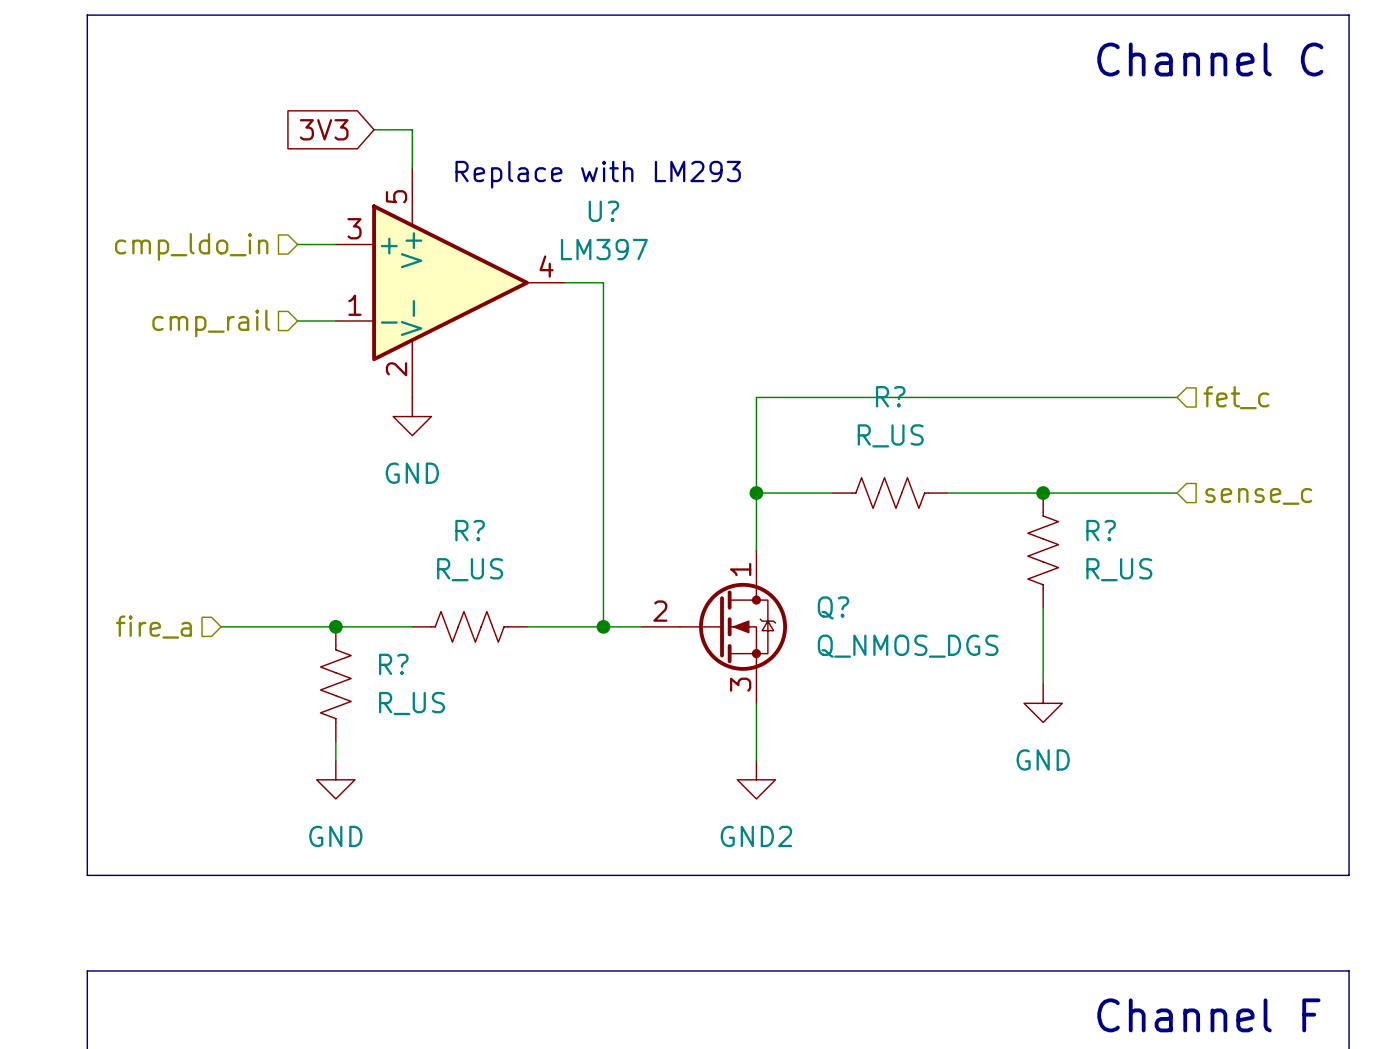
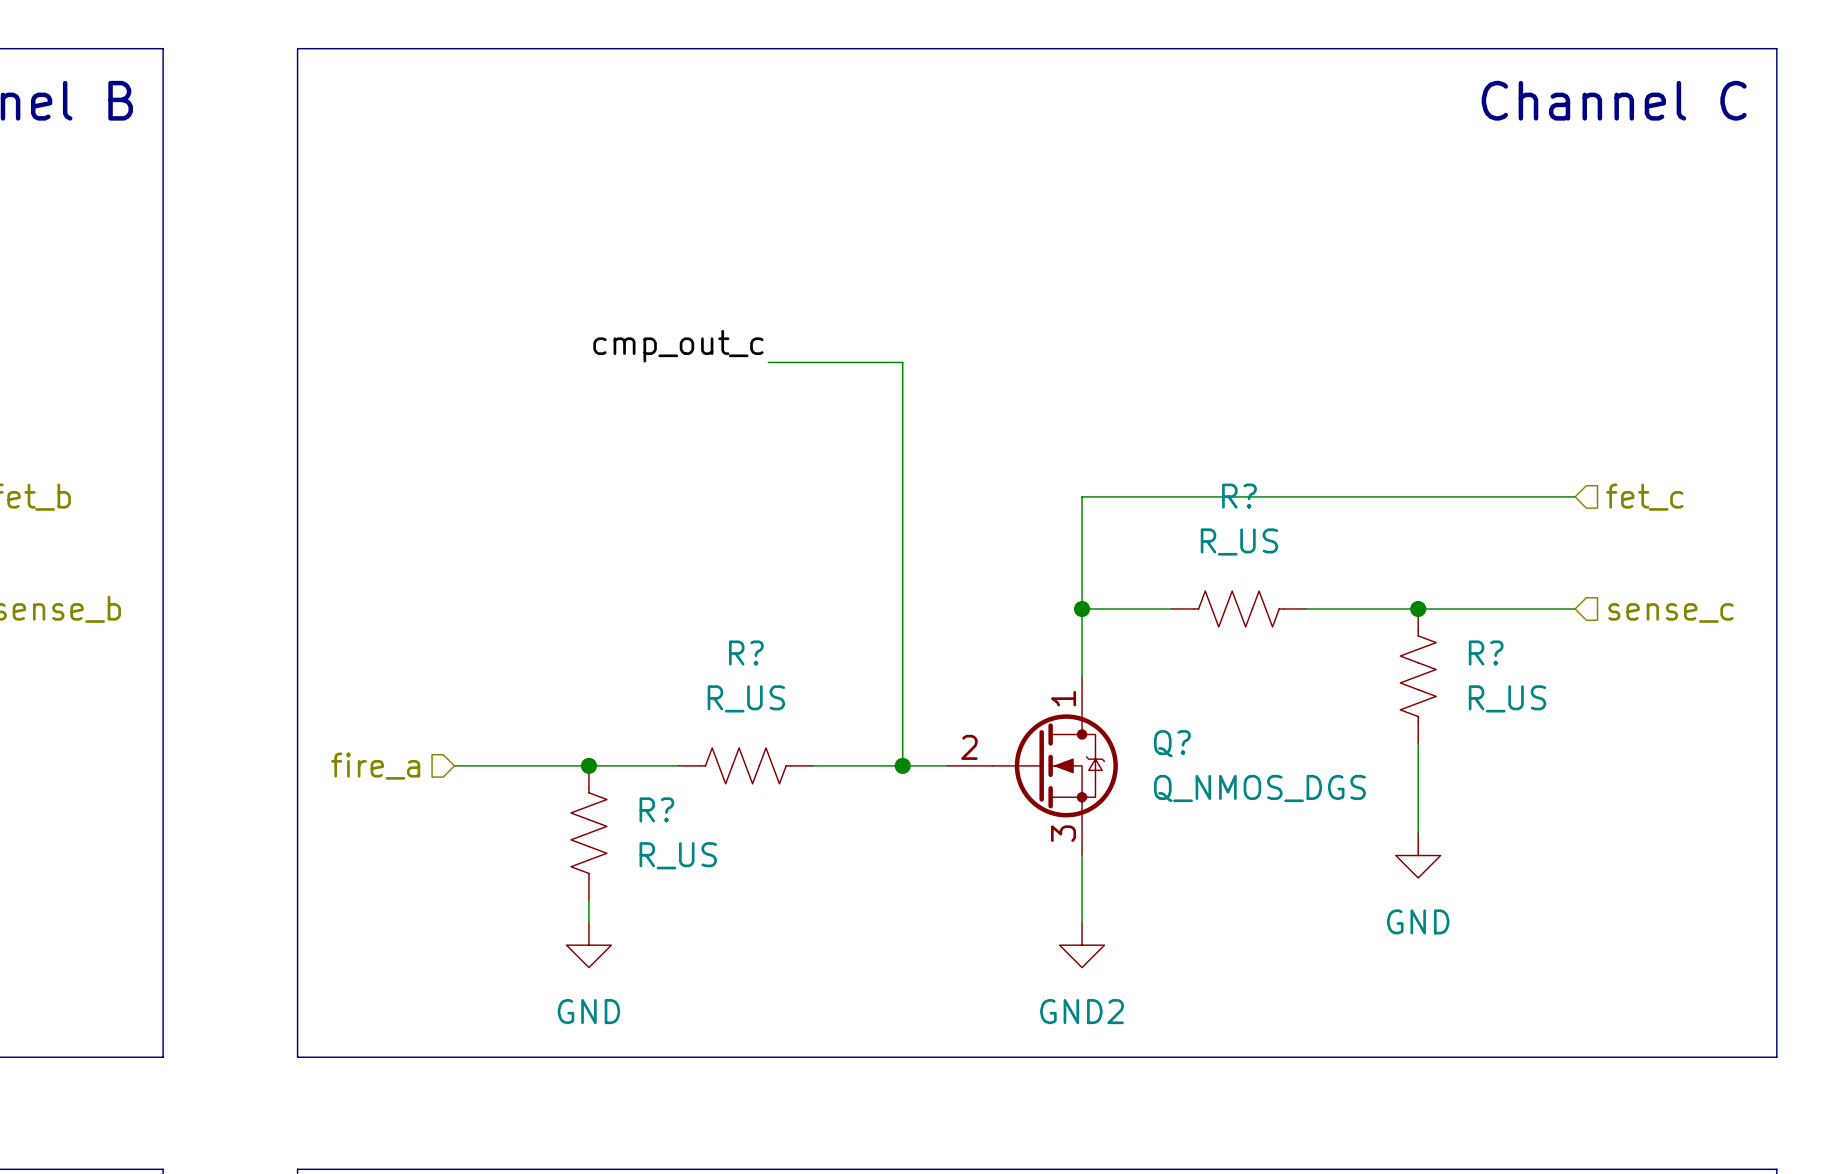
global label: 3V3 (324, 129) -> none
wire: (374, 129) (412, 129) (412, 168) -> none
text: Replace with LM293 (598, 174) -> none
wire: (297, 244) (335, 244) -> none
hierarchical label: cmp_ldo_in (191, 246) -> none
label: none -> cmp_out_c (678, 346)
U?: LM397 (450, 282) -> none
wire: (297, 320) (335, 320) -> none
hierarchical label: cmp_rail (211, 323) -> none
power symbol: GND (412, 416) -> none

